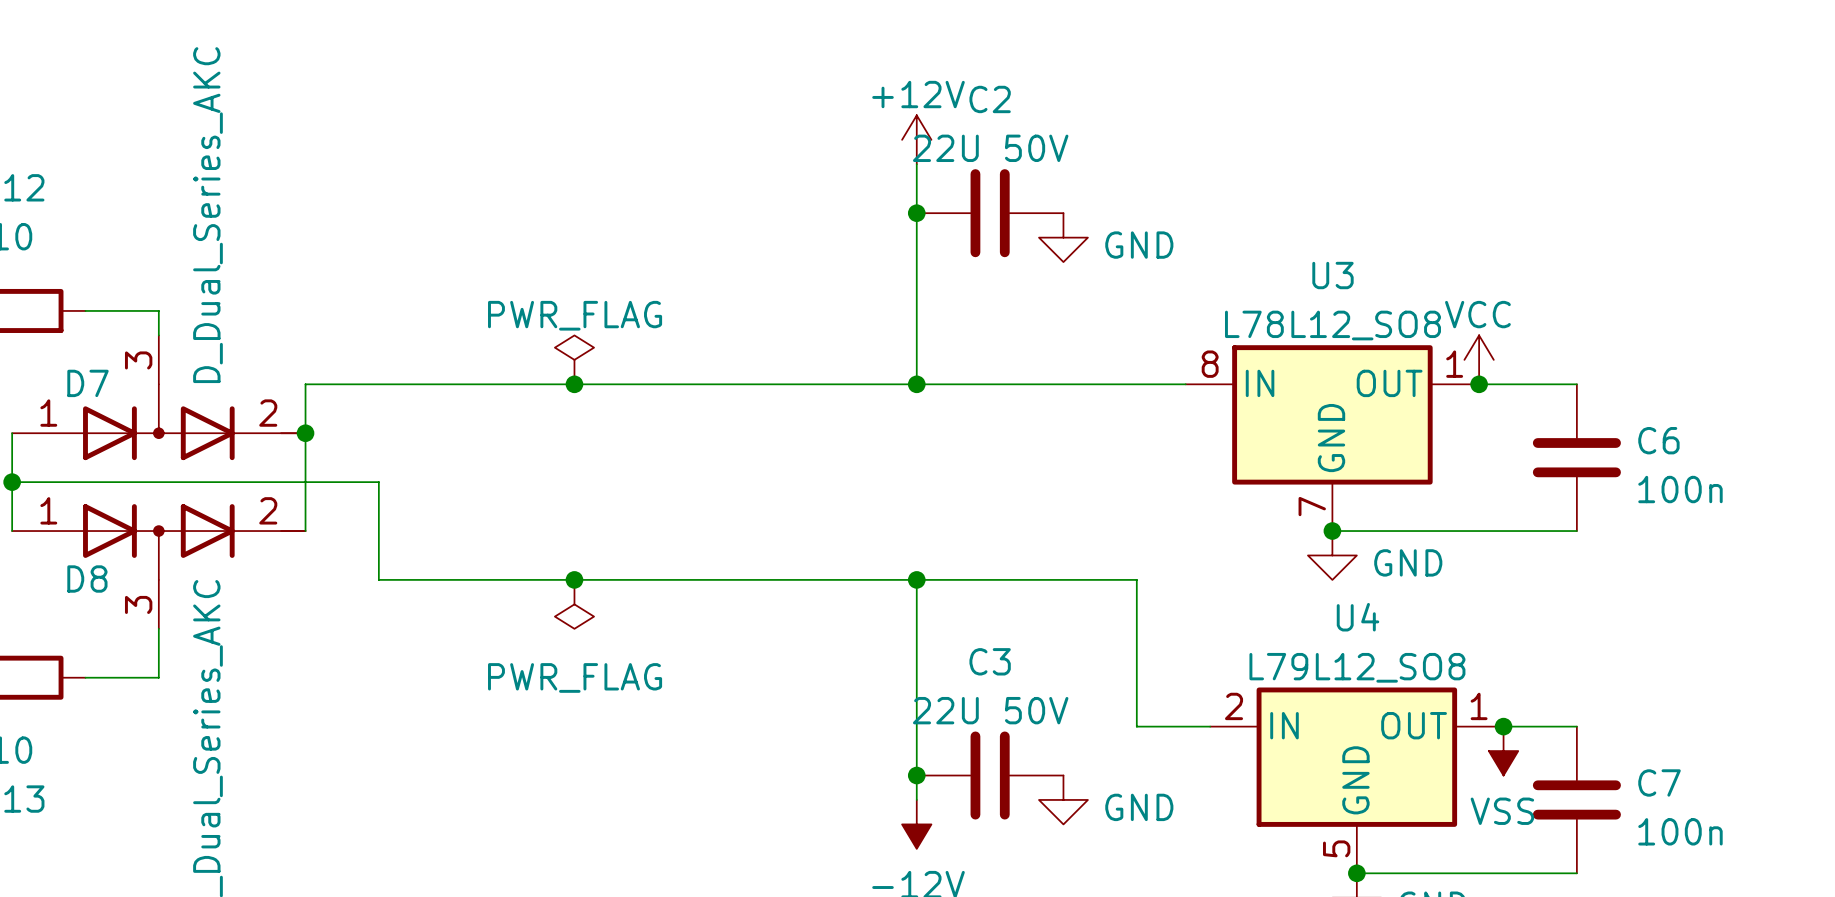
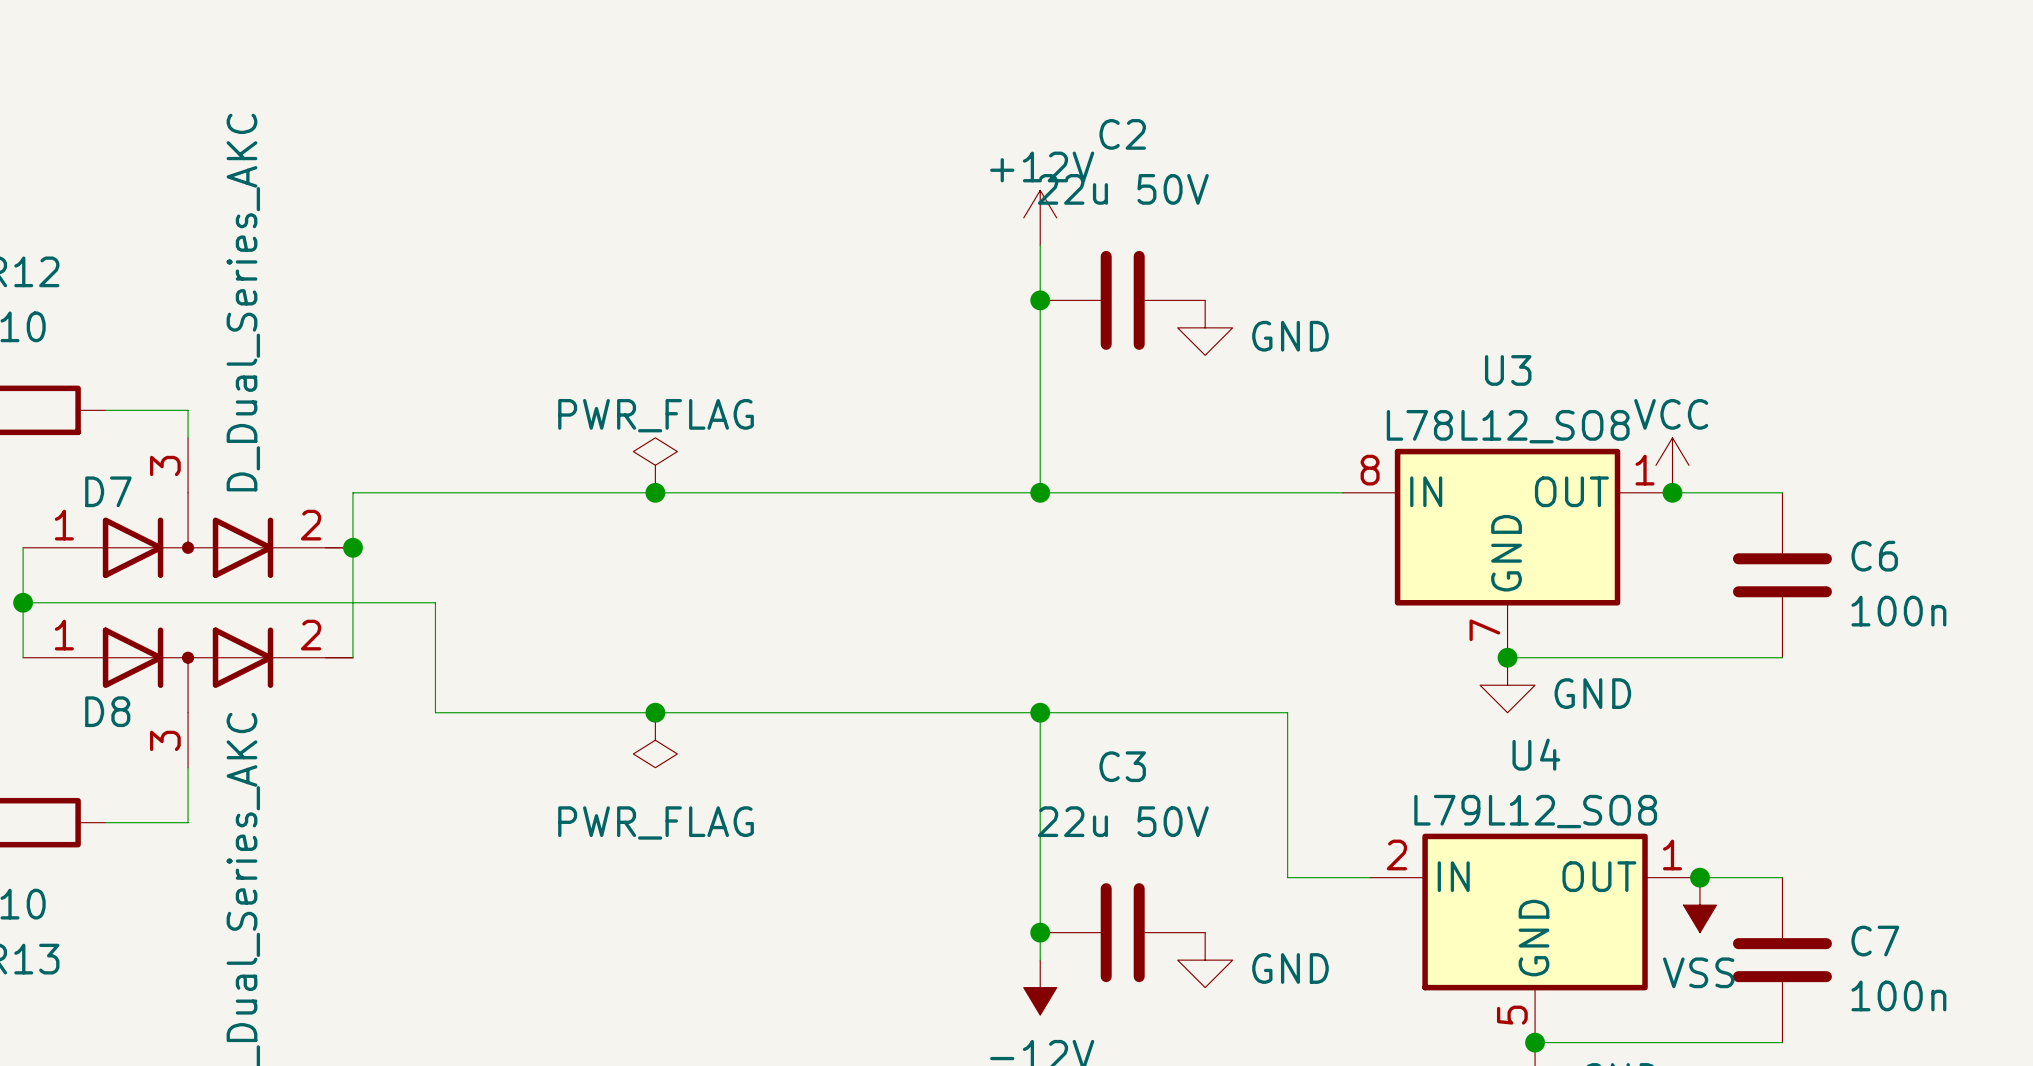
C2 name position: C2 (990, 99) -> C2 (1122, 134)
C2 value: 22U 50V (990, 148) -> 22u 50V (1123, 189)
C3 name position: C3 (990, 661) -> C3 (1122, 766)
C3 value: 22U 50V (990, 710) -> 22u 50V (1123, 821)

